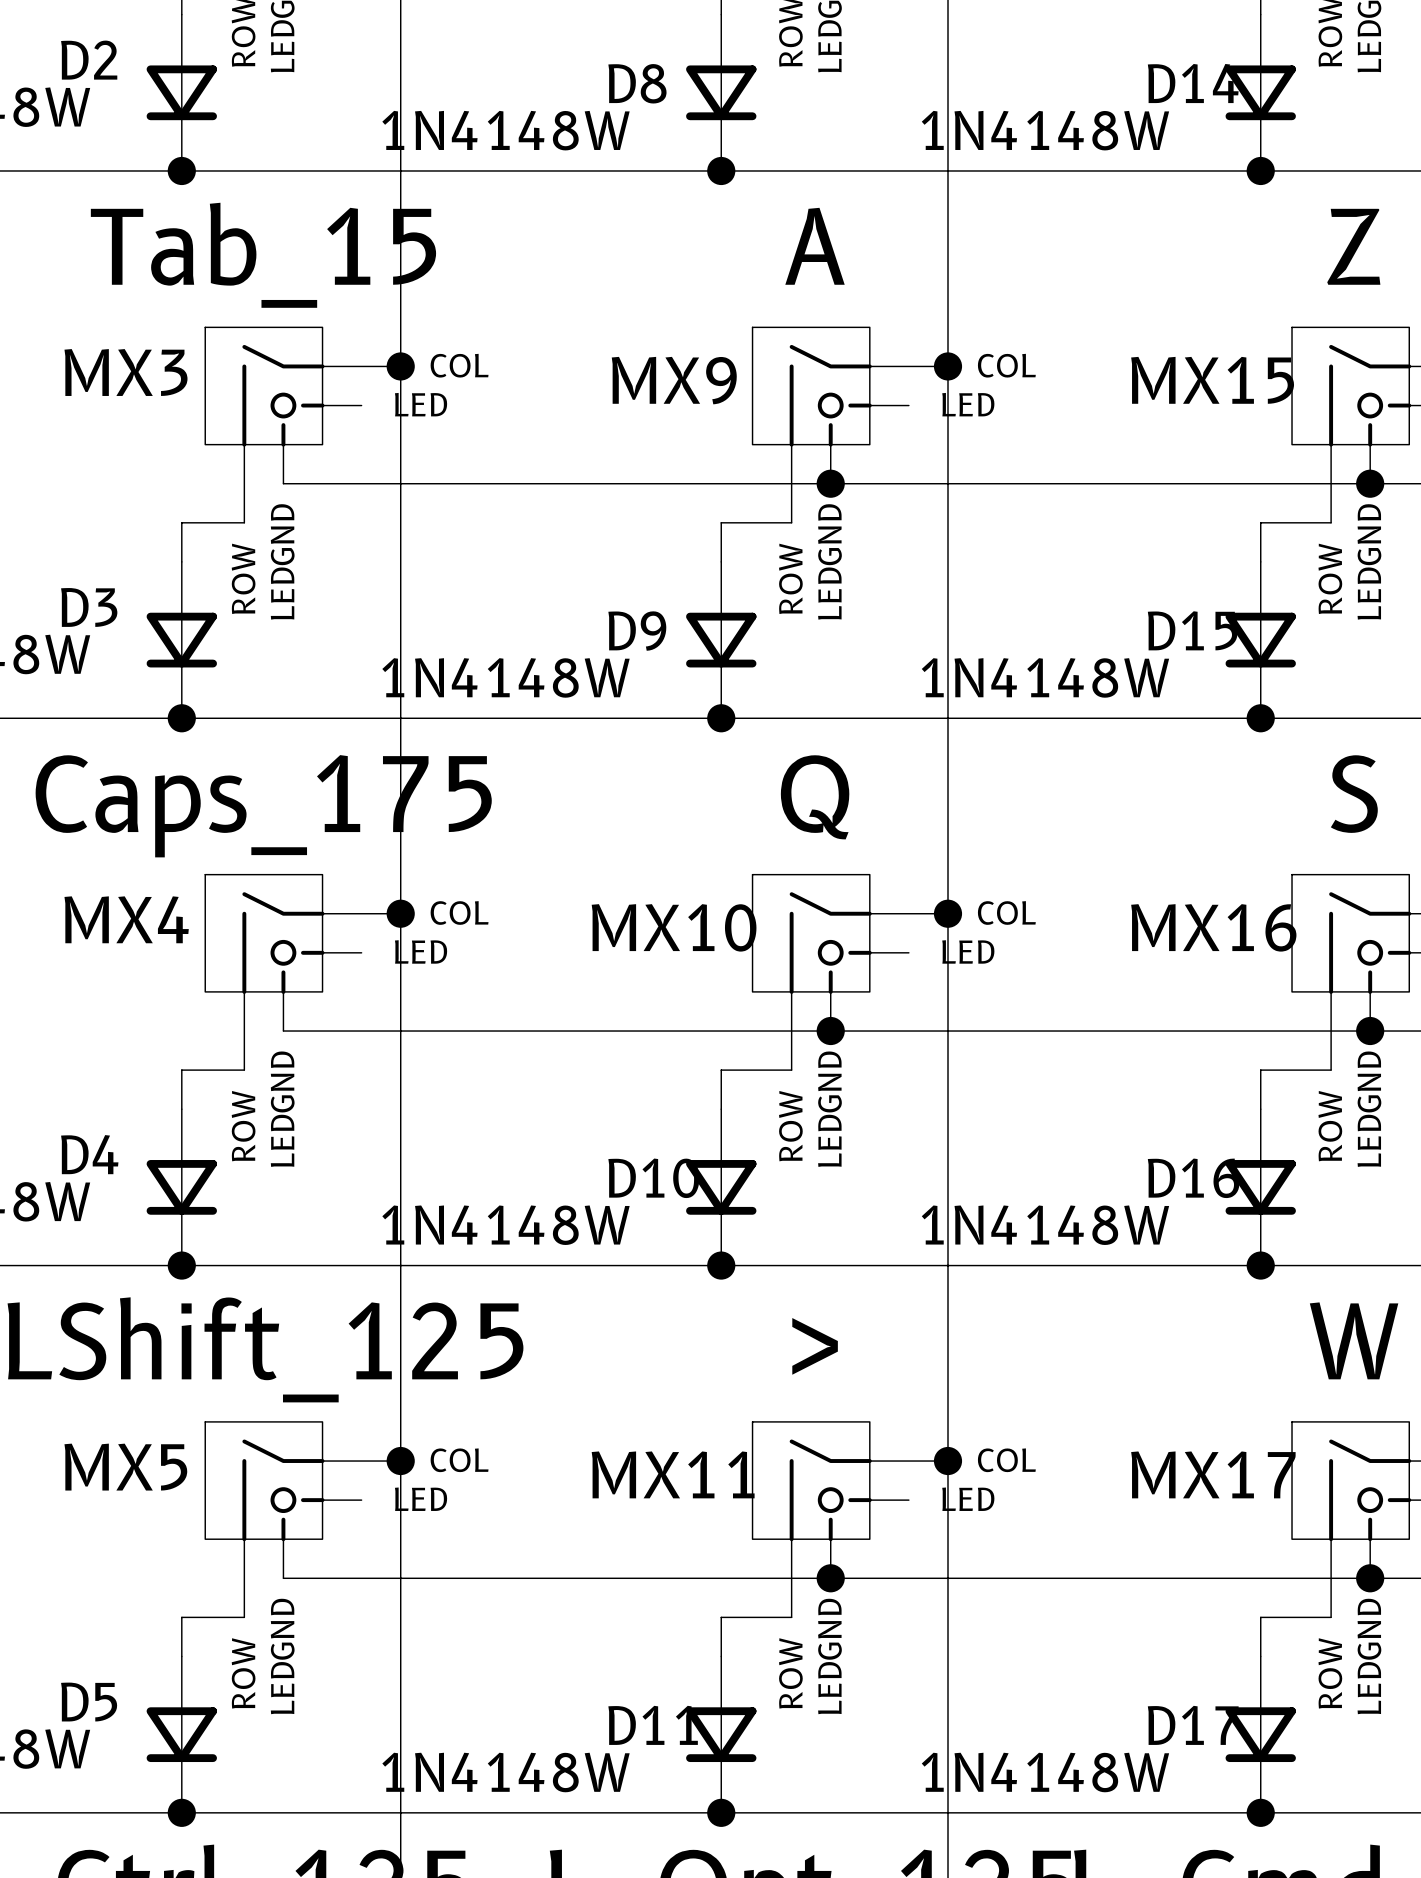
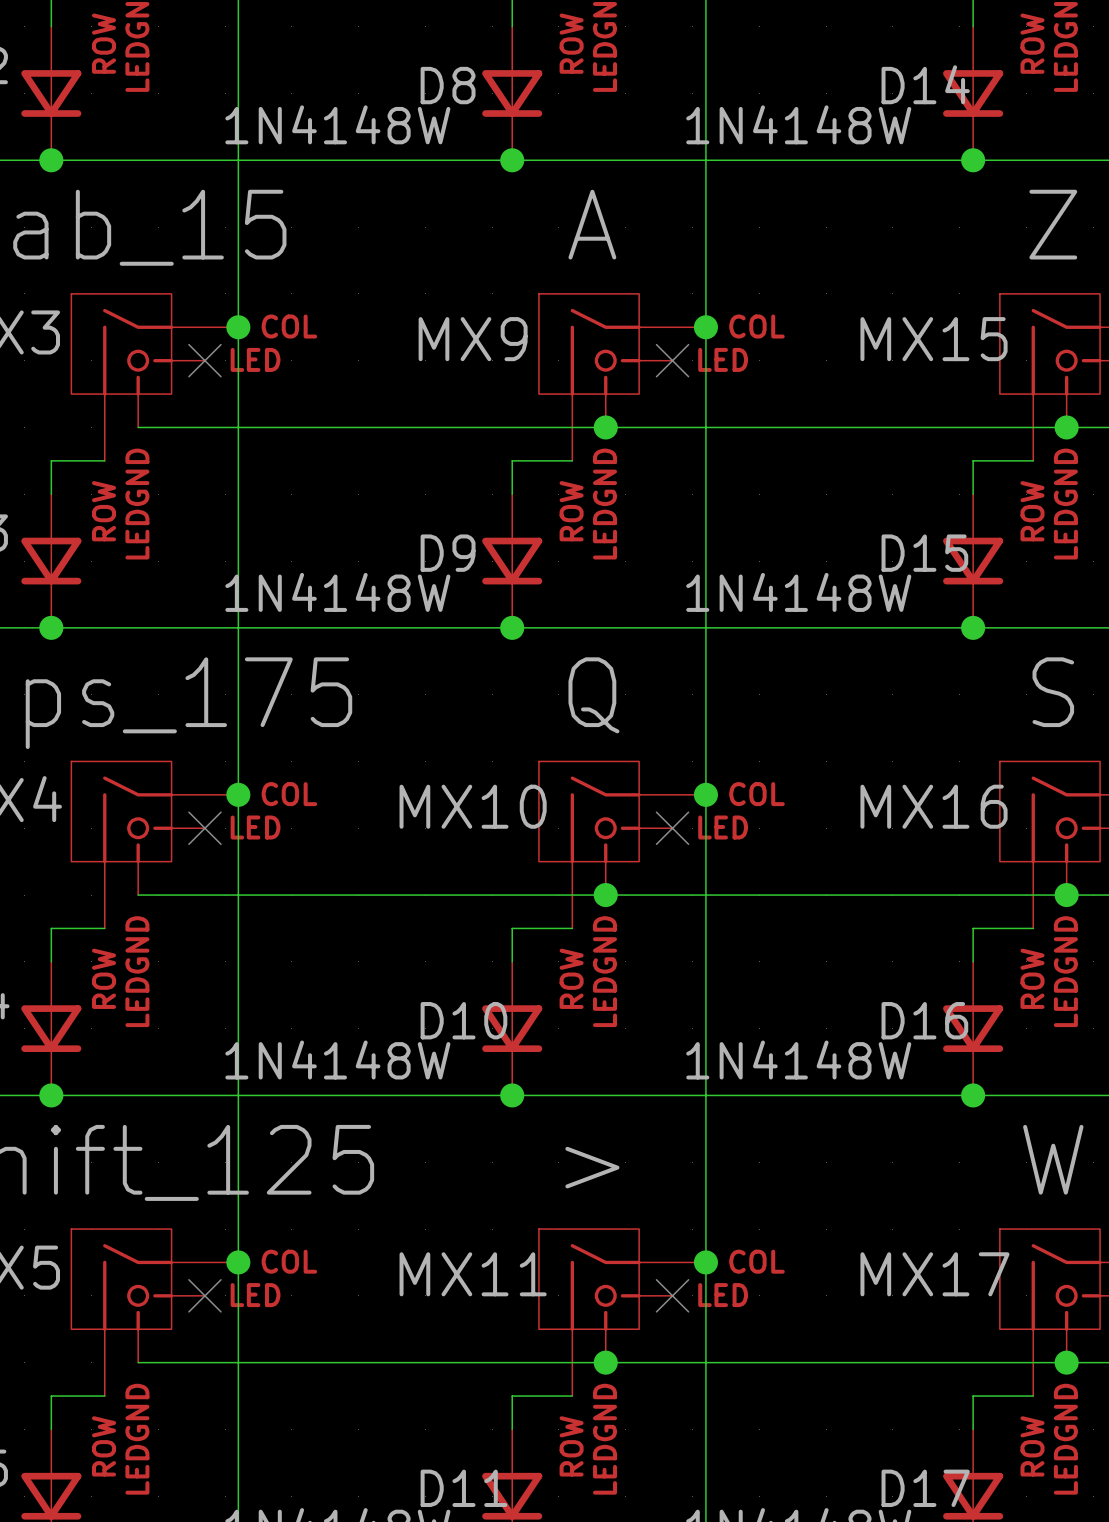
no-connect mark: none -> (204, 360)
no-connect mark: none -> (672, 360)
no-connect mark: none -> (204, 828)
no-connect mark: none -> (672, 828)
no-connect mark: none -> (204, 1295)
no-connect mark: none -> (672, 1295)

